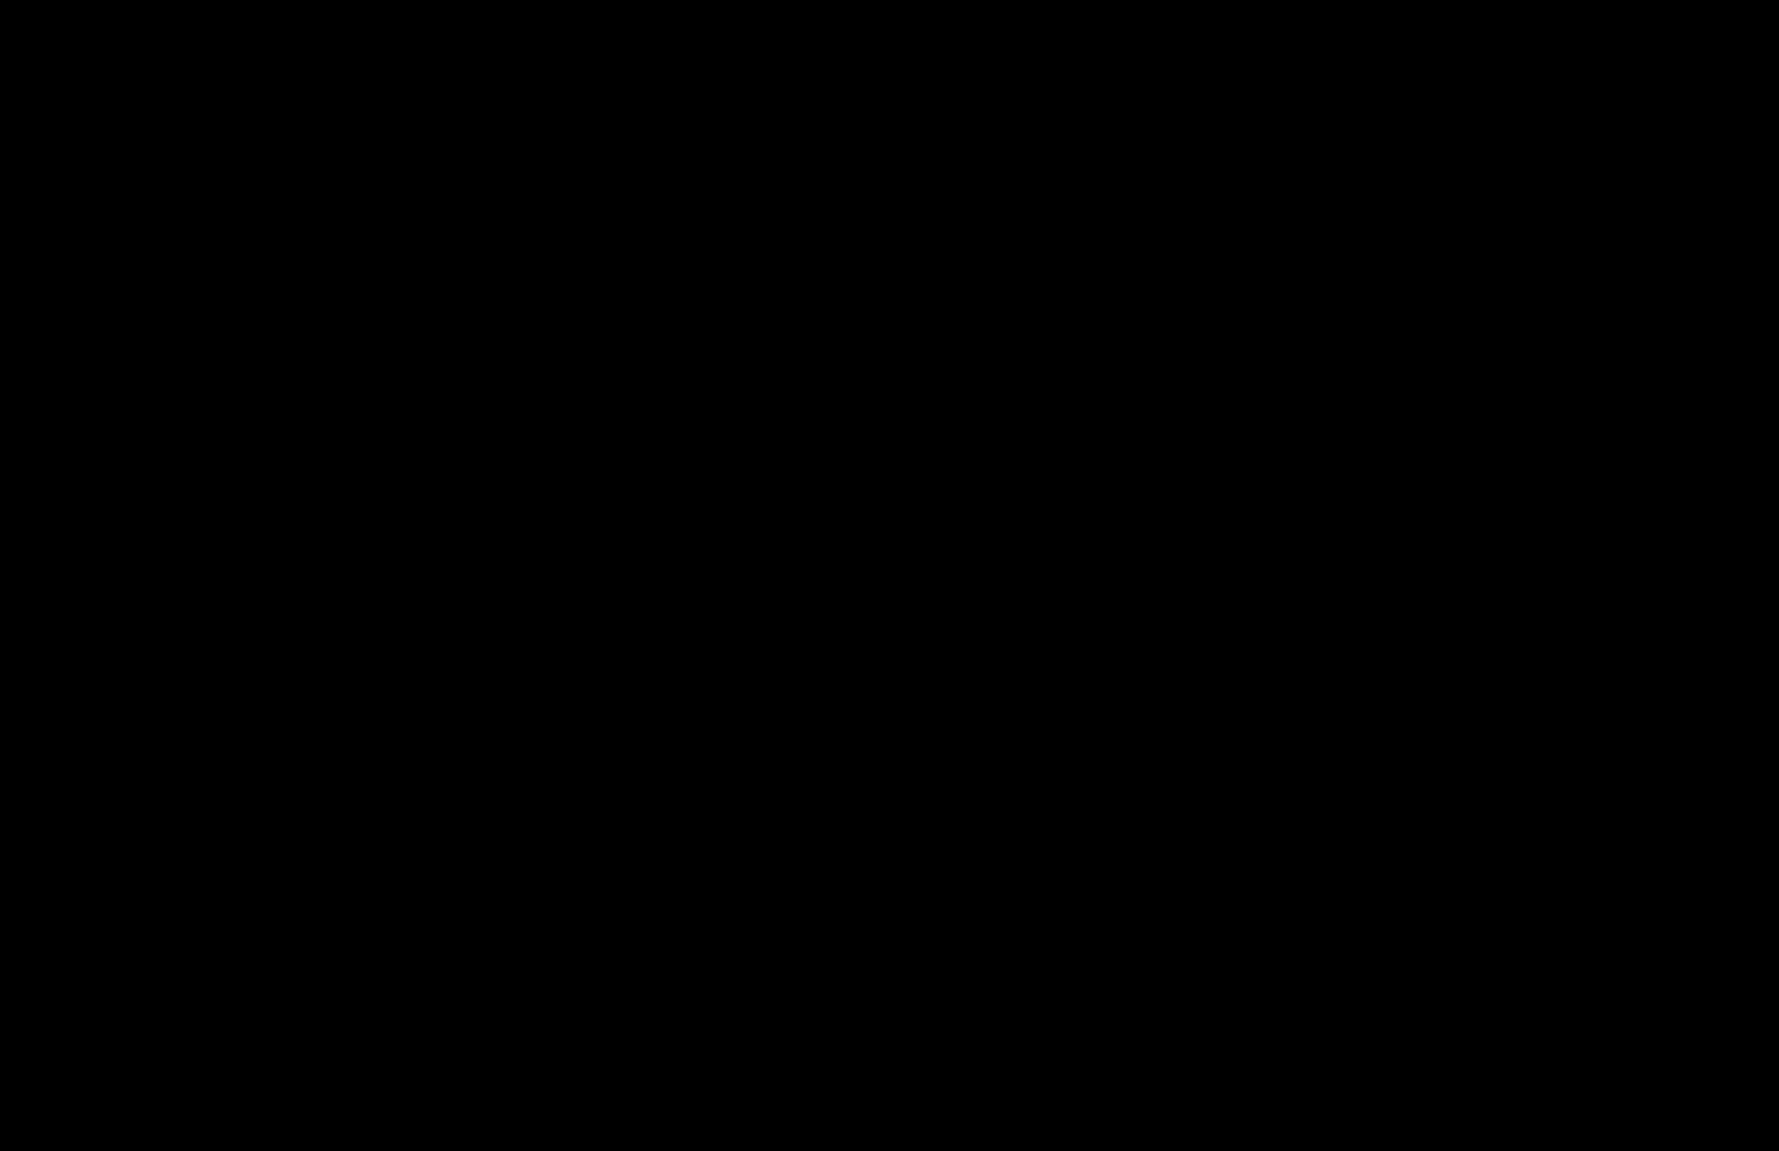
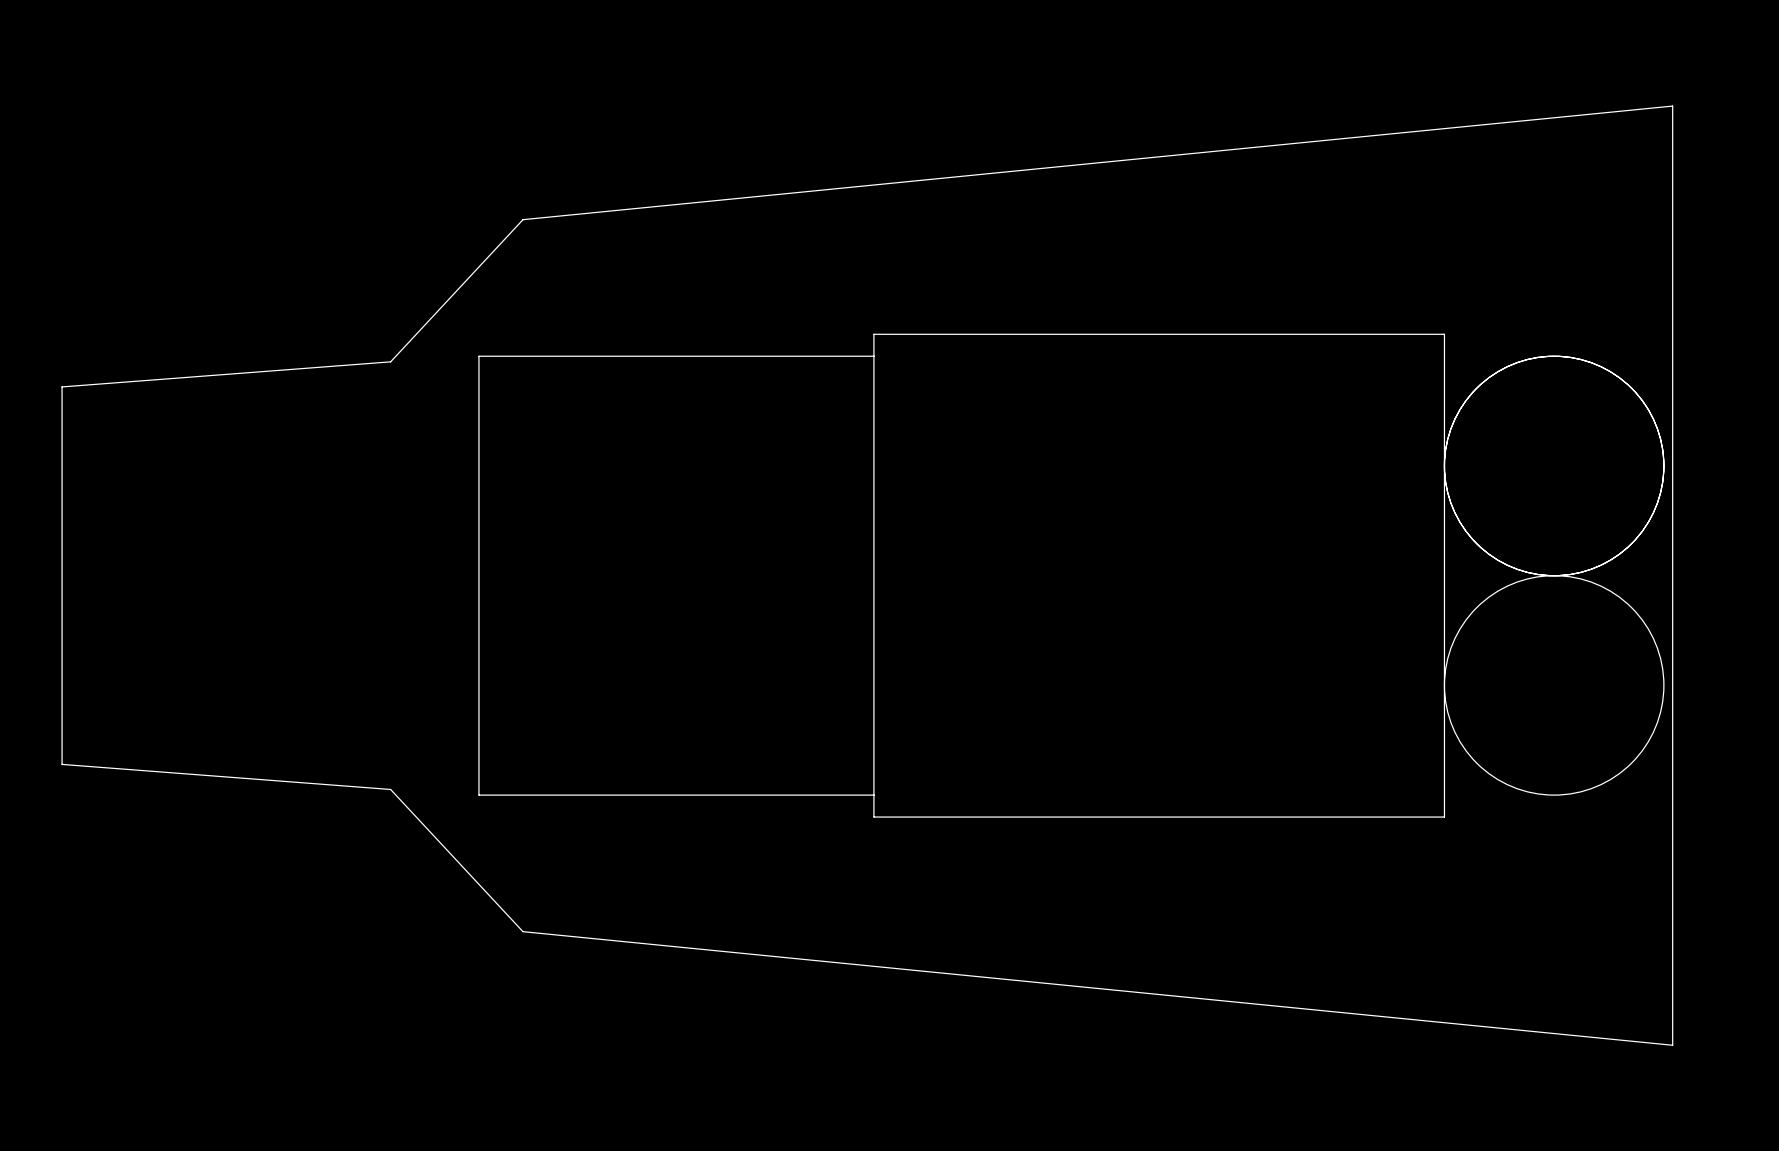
board edge: none -> (1672, 106) (522, 219) (390, 361) (62, 386) (62, 764) (390, 789) (522, 931) (1672, 1045) (1672, 106)
board edge: none -> (1444, 334) (1444, 817) (873, 817) (873, 334) (1444, 334)
board edge: none -> (873, 356) (478, 356) (478, 795) (873, 795)
round board edge: none -> [1444, 356, 1664, 576]
round board edge: none -> [1444, 575, 1664, 796]

